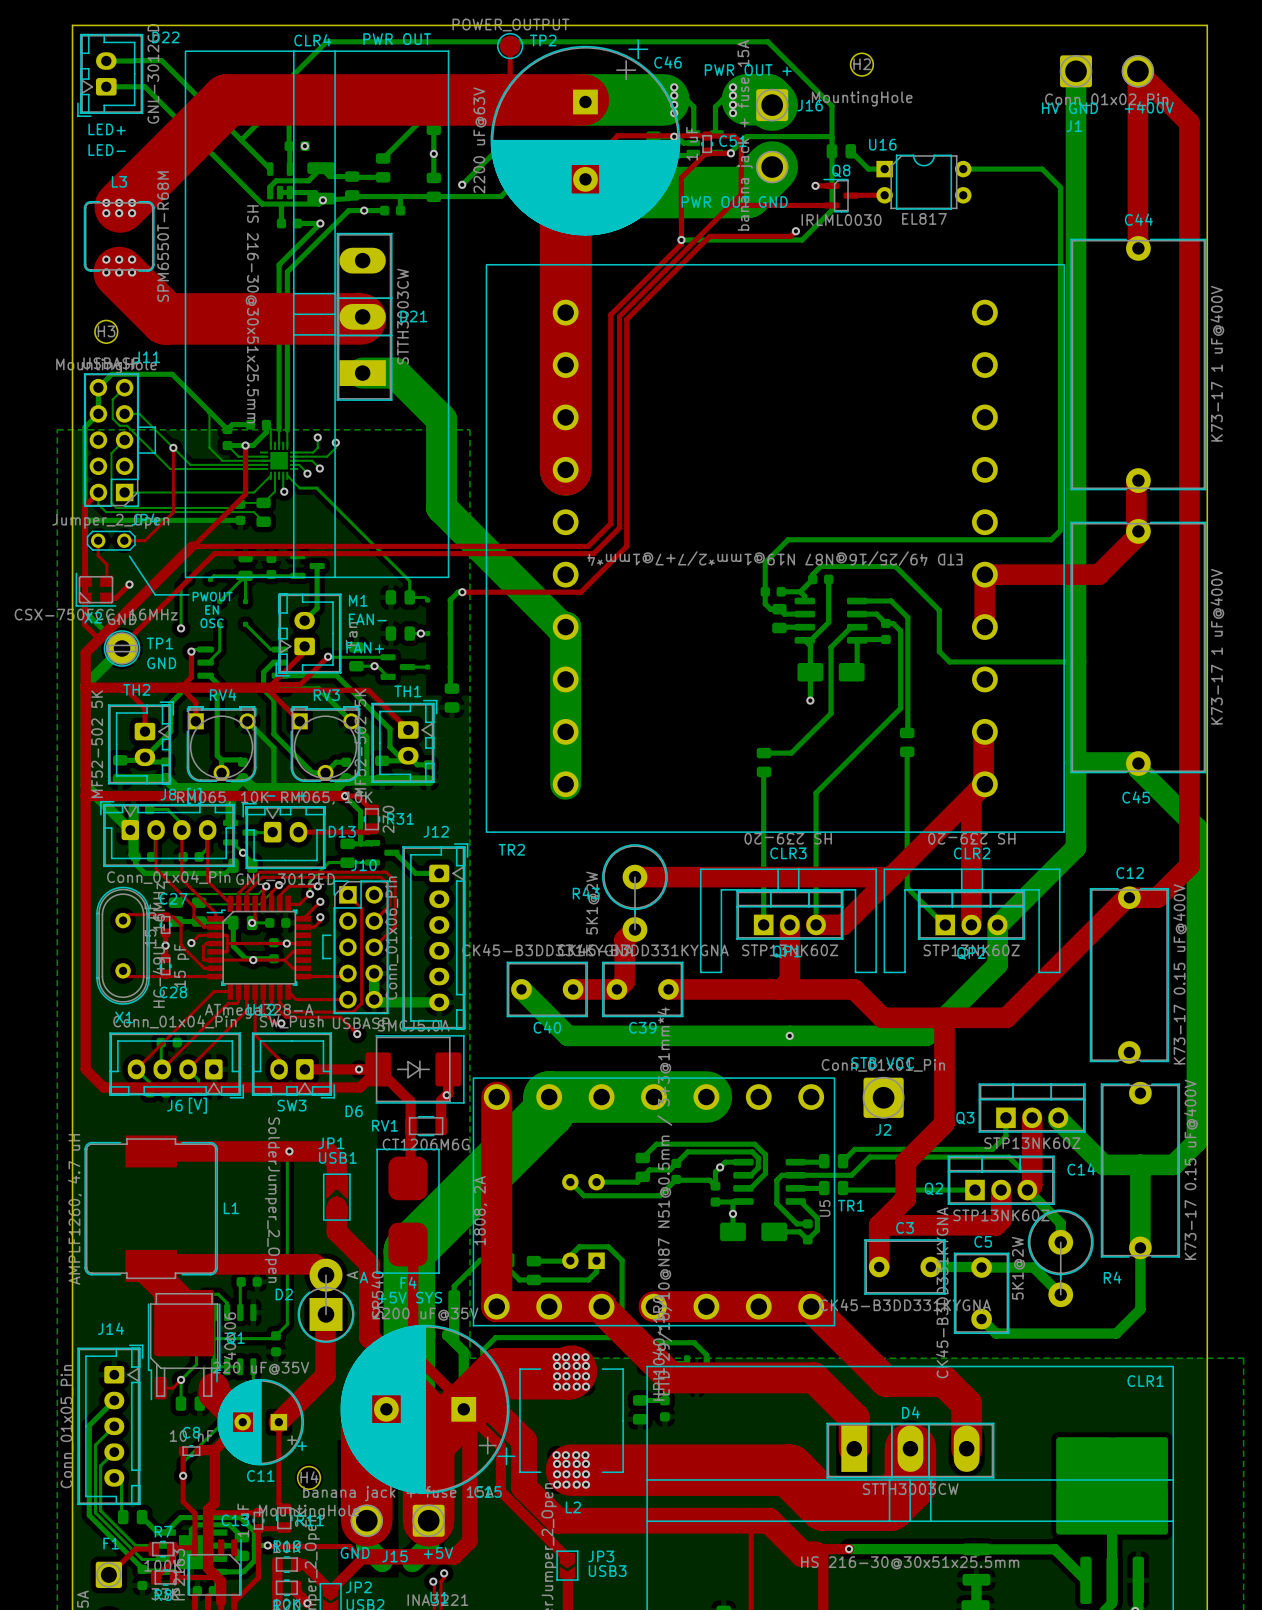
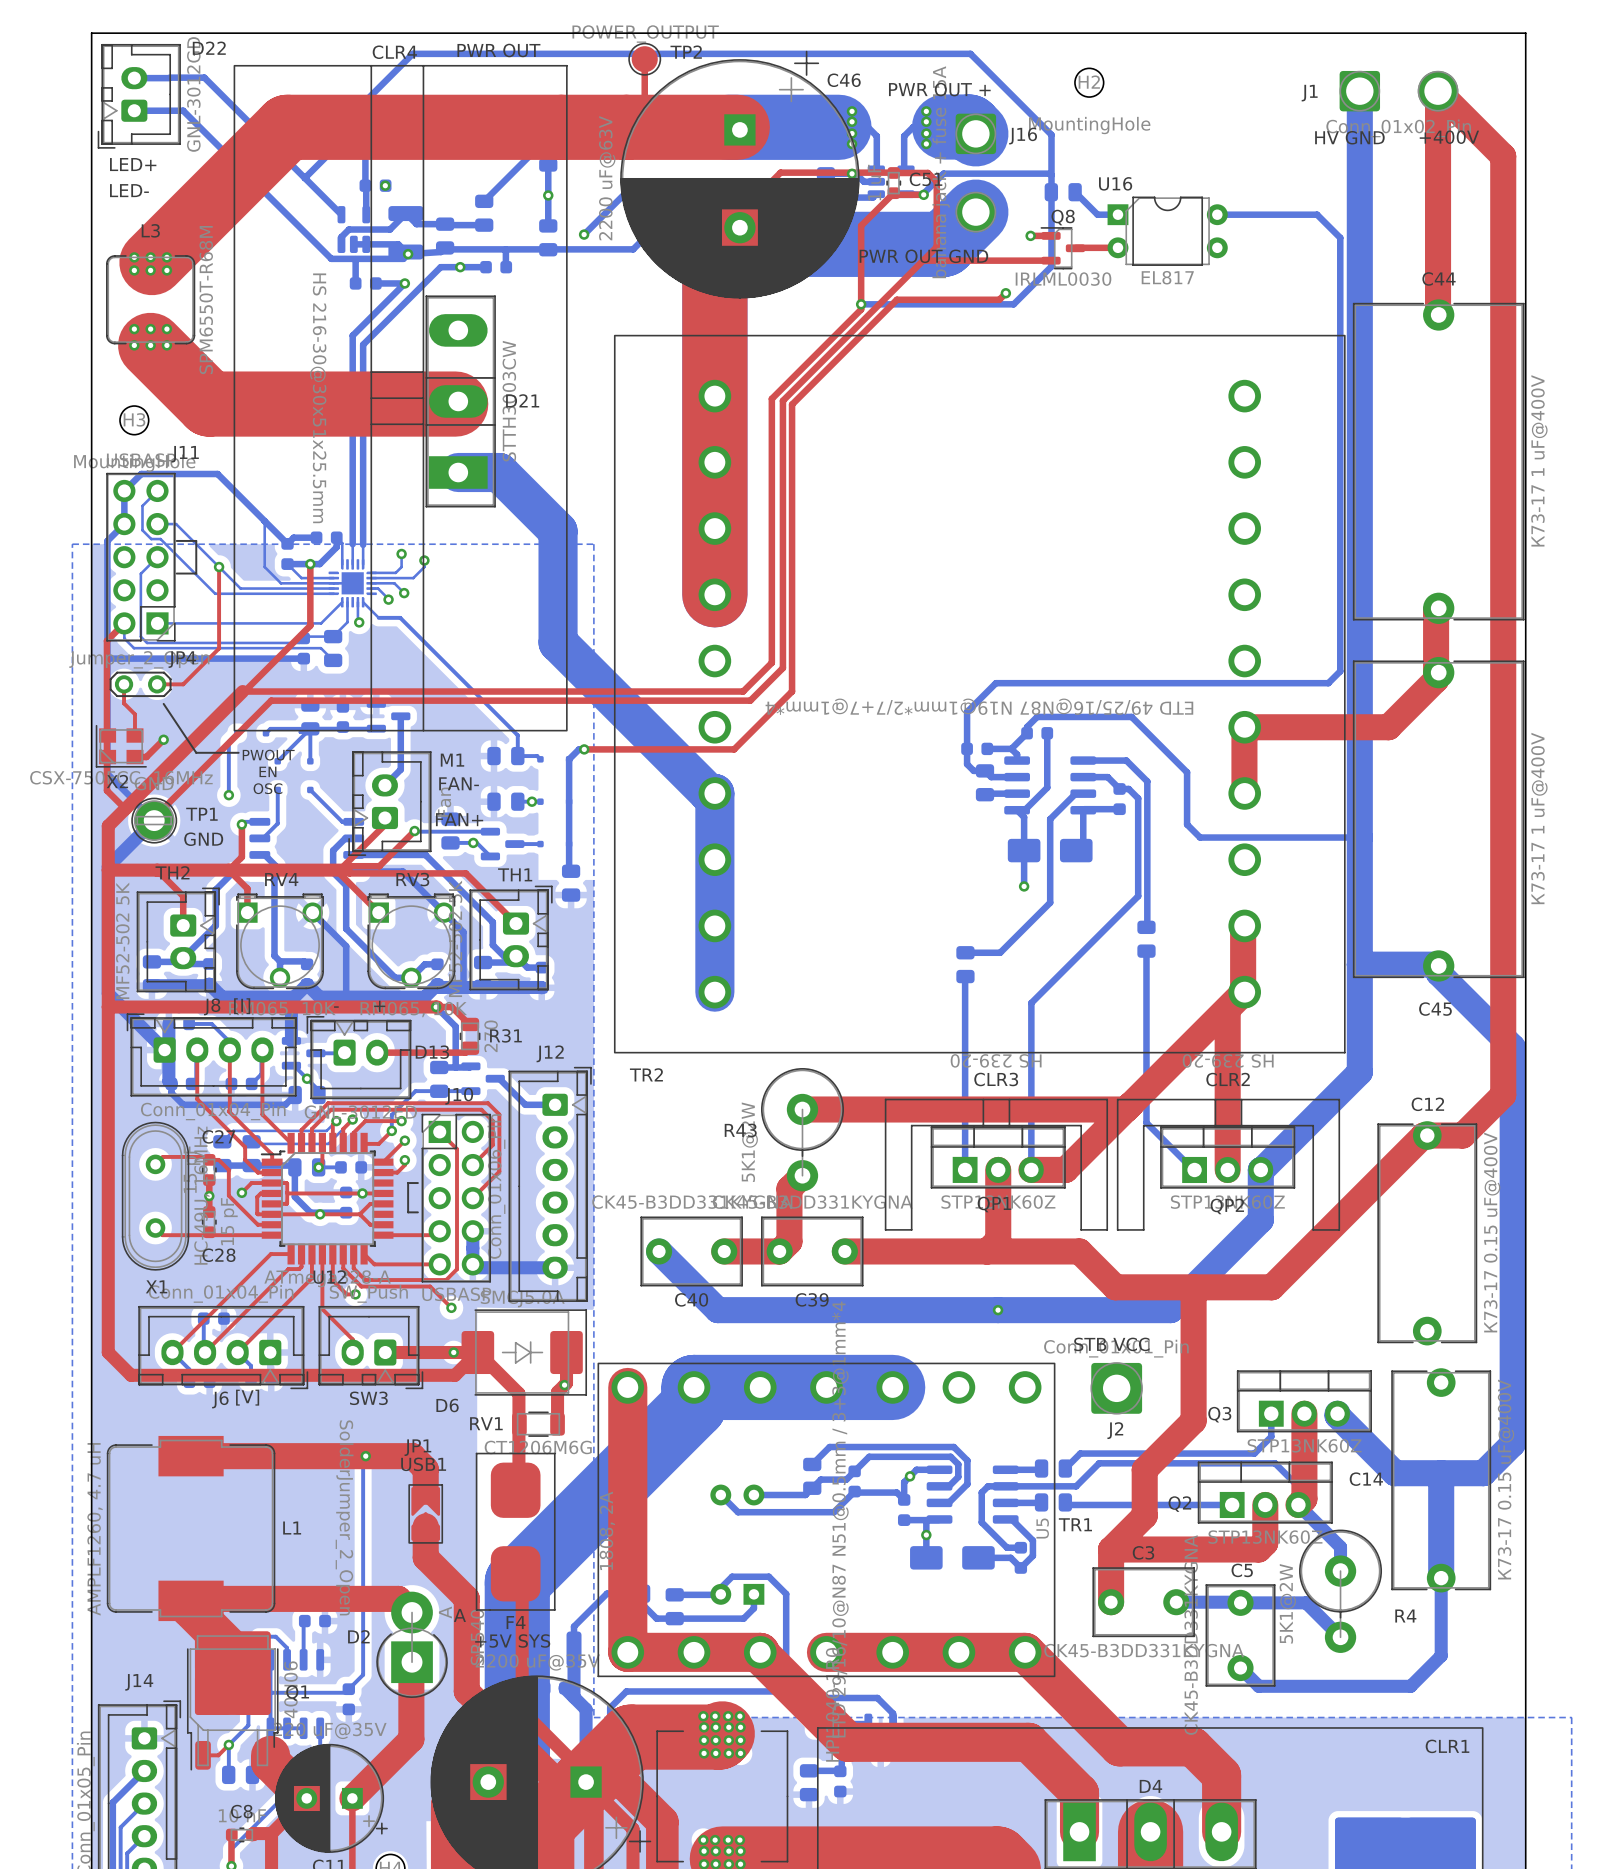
J1 name position: J1 (1074, 126) -> J1 (1309, 93)

